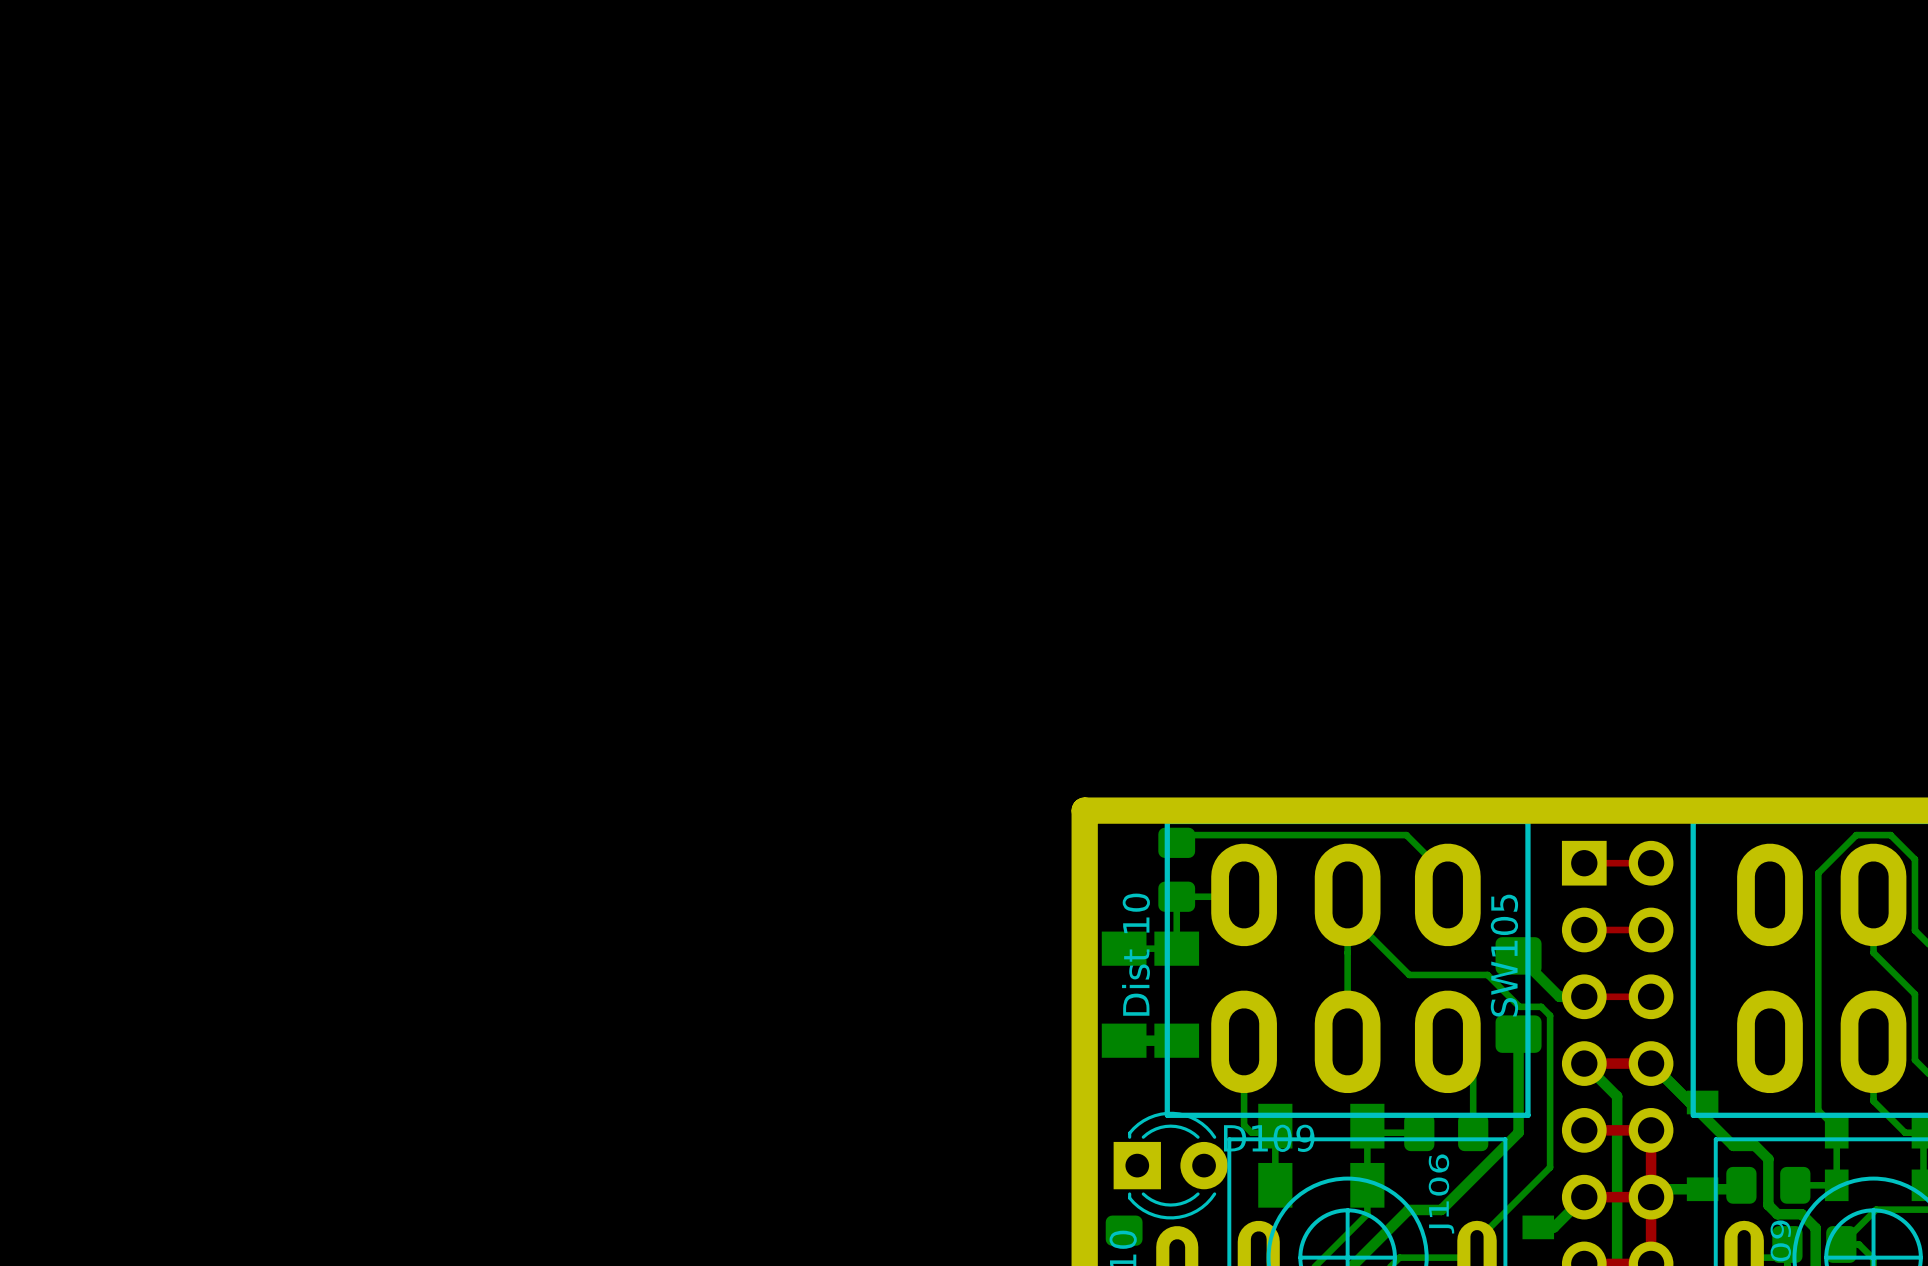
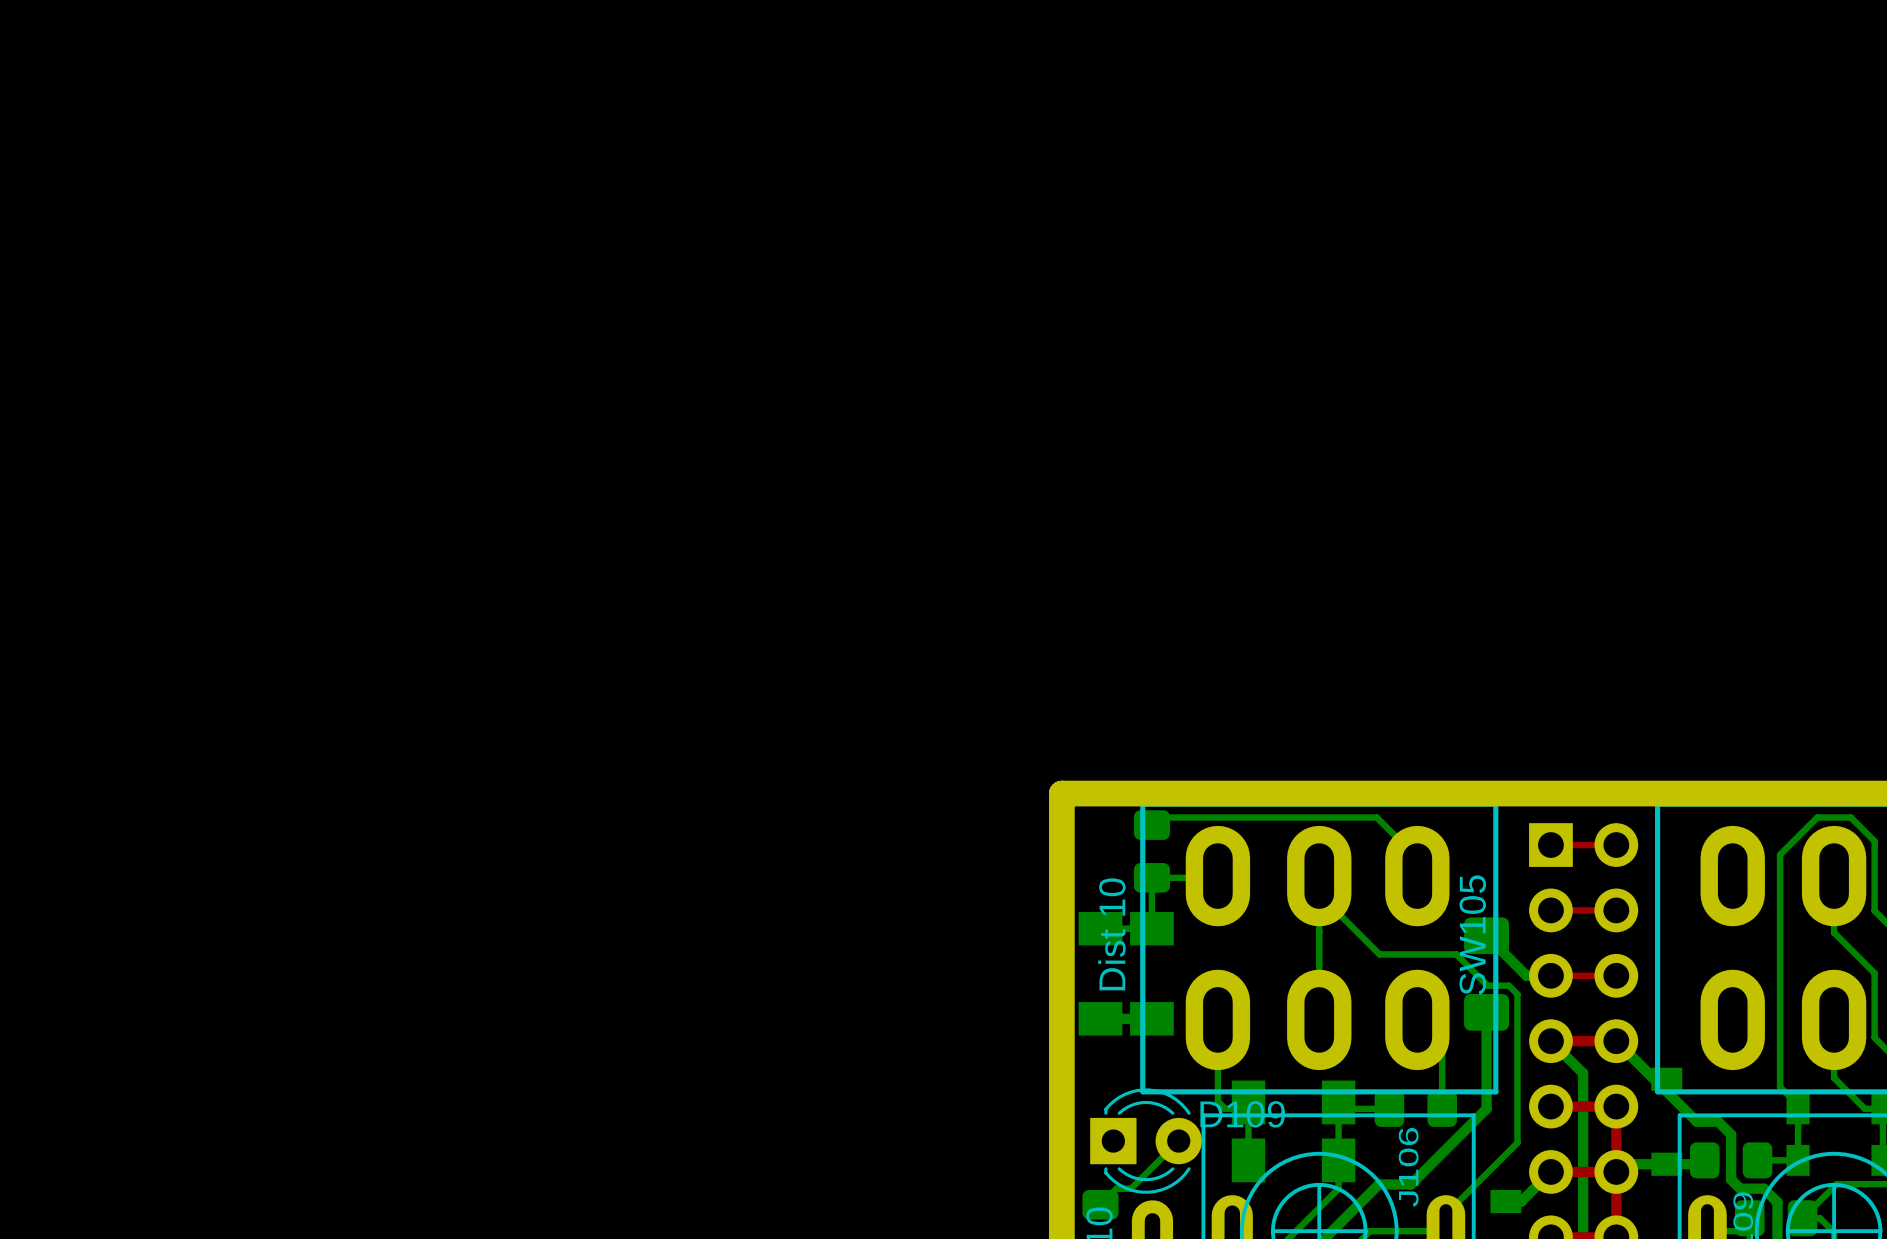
bottom track: none -> (1178, 1141) (1131, 1188) (1116, 1188) (1100, 1204)

